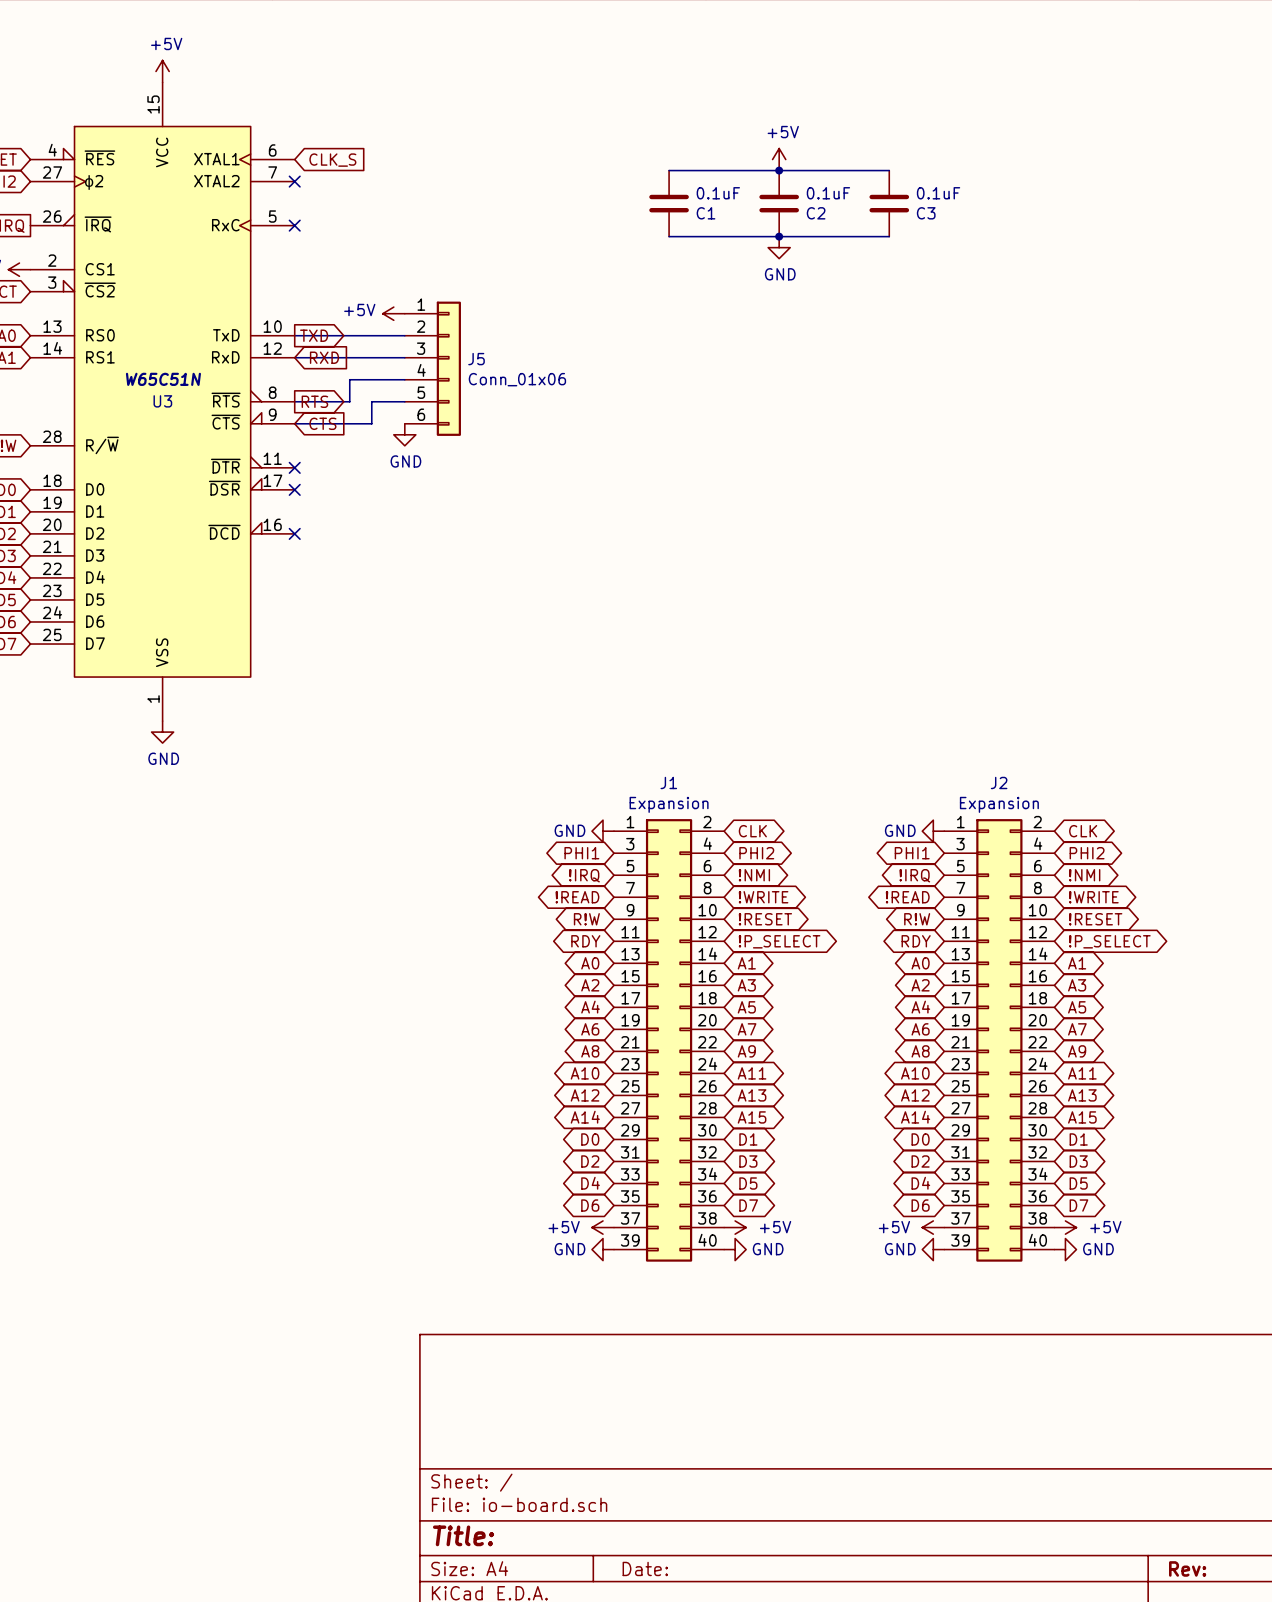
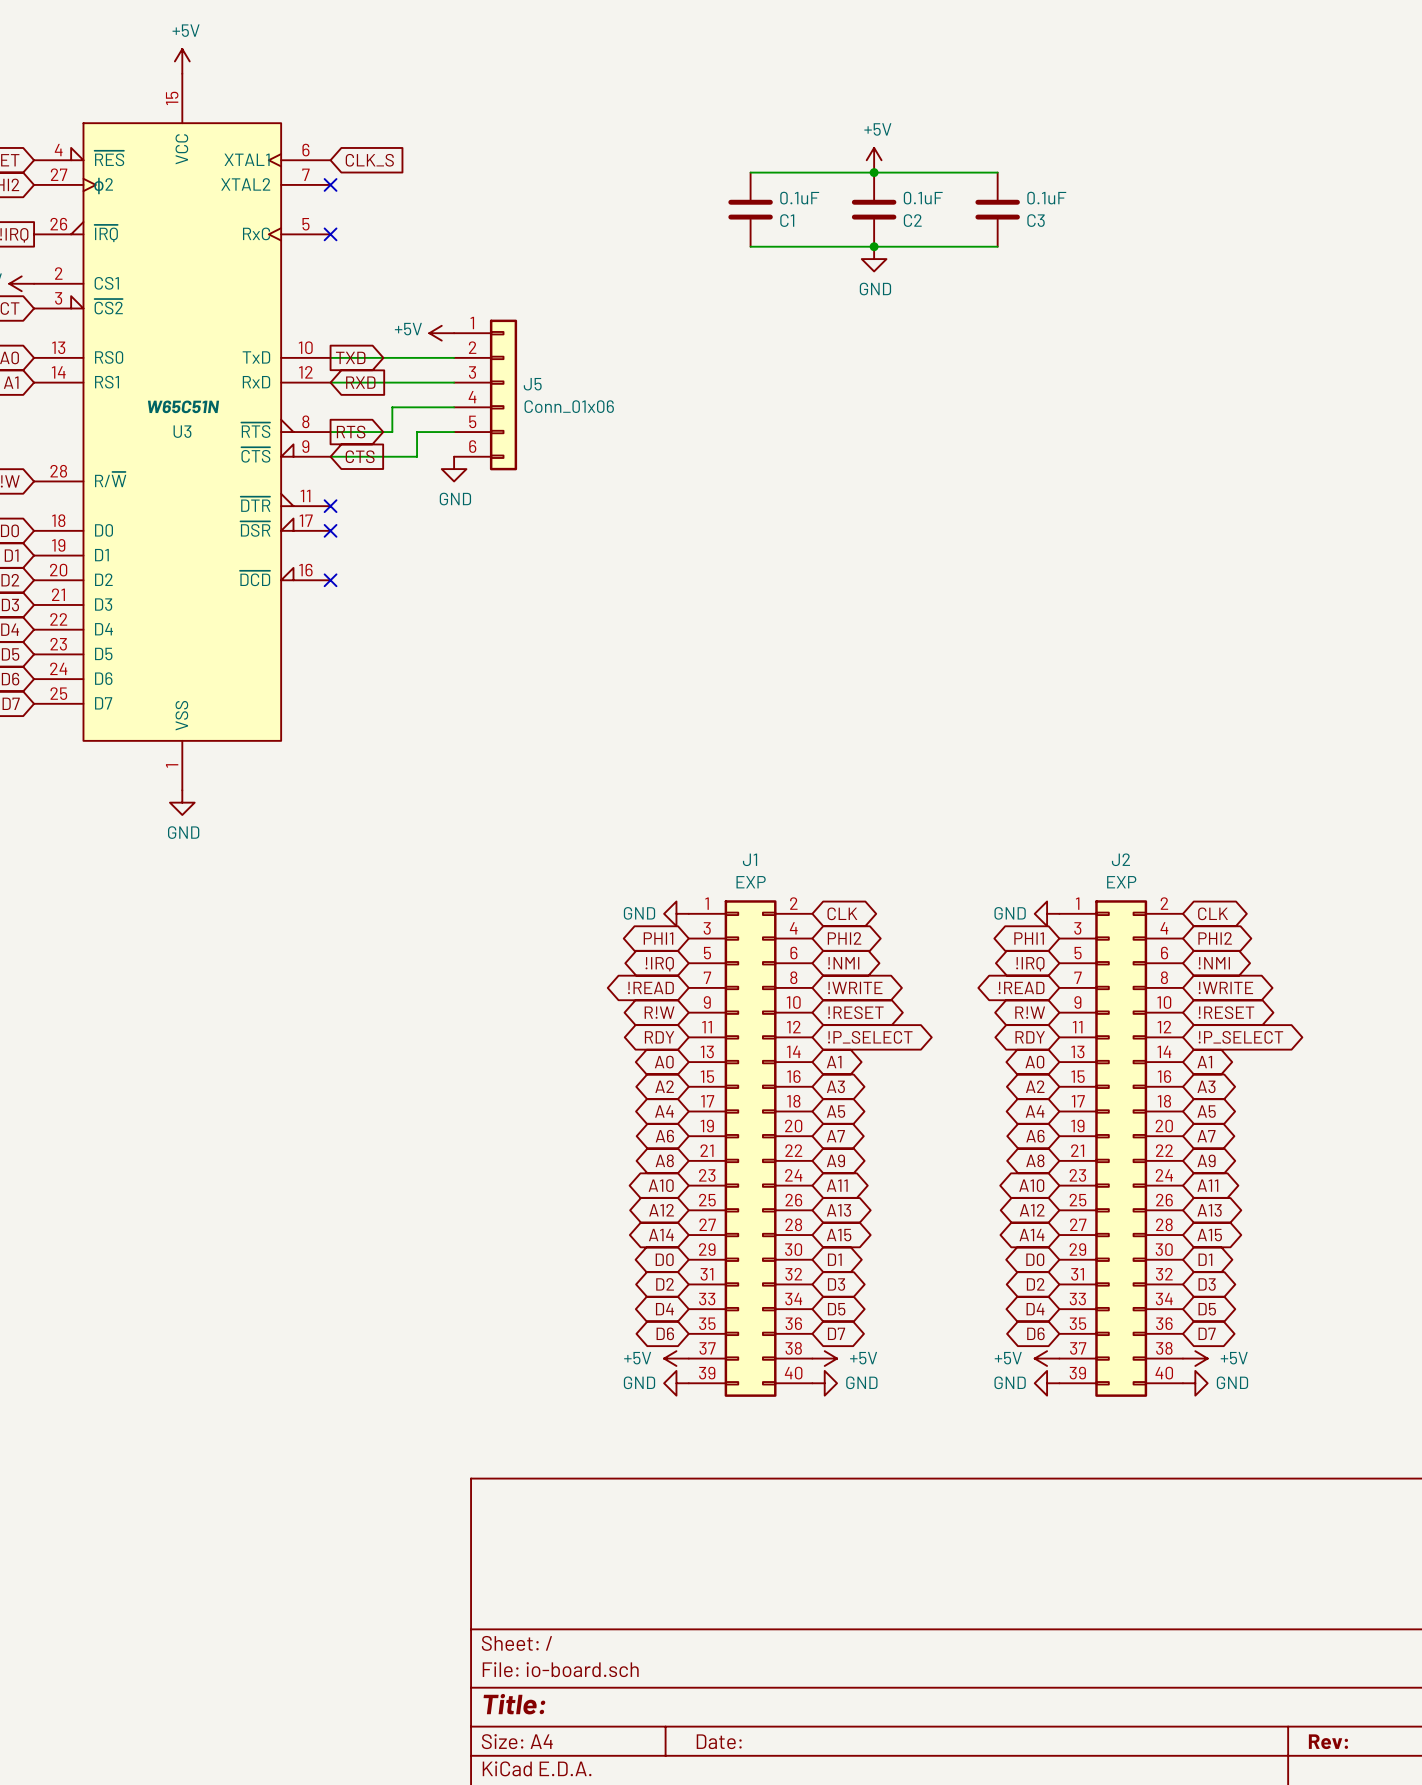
J1 value: Expansion (669, 804) -> EXP (751, 882)
J2 value: Expansion (999, 804) -> EXP (1121, 882)

